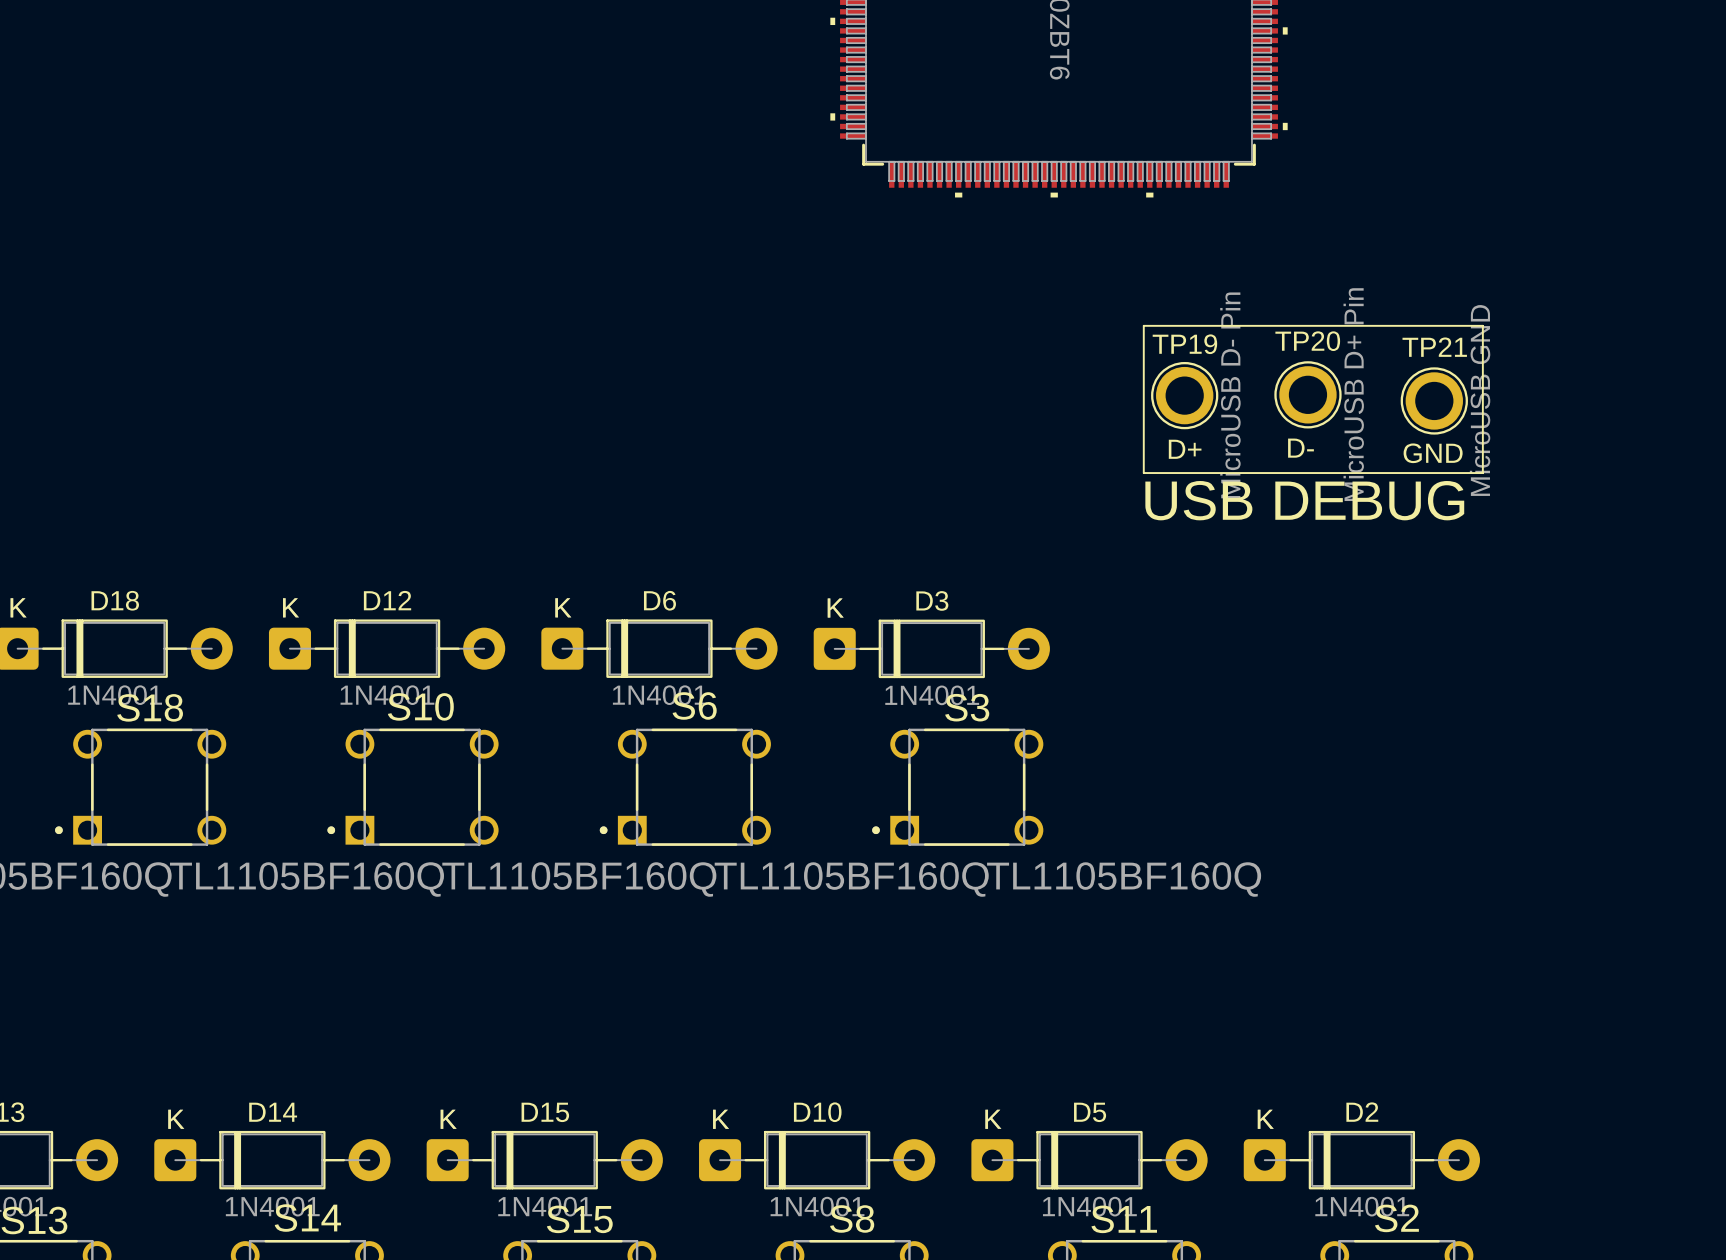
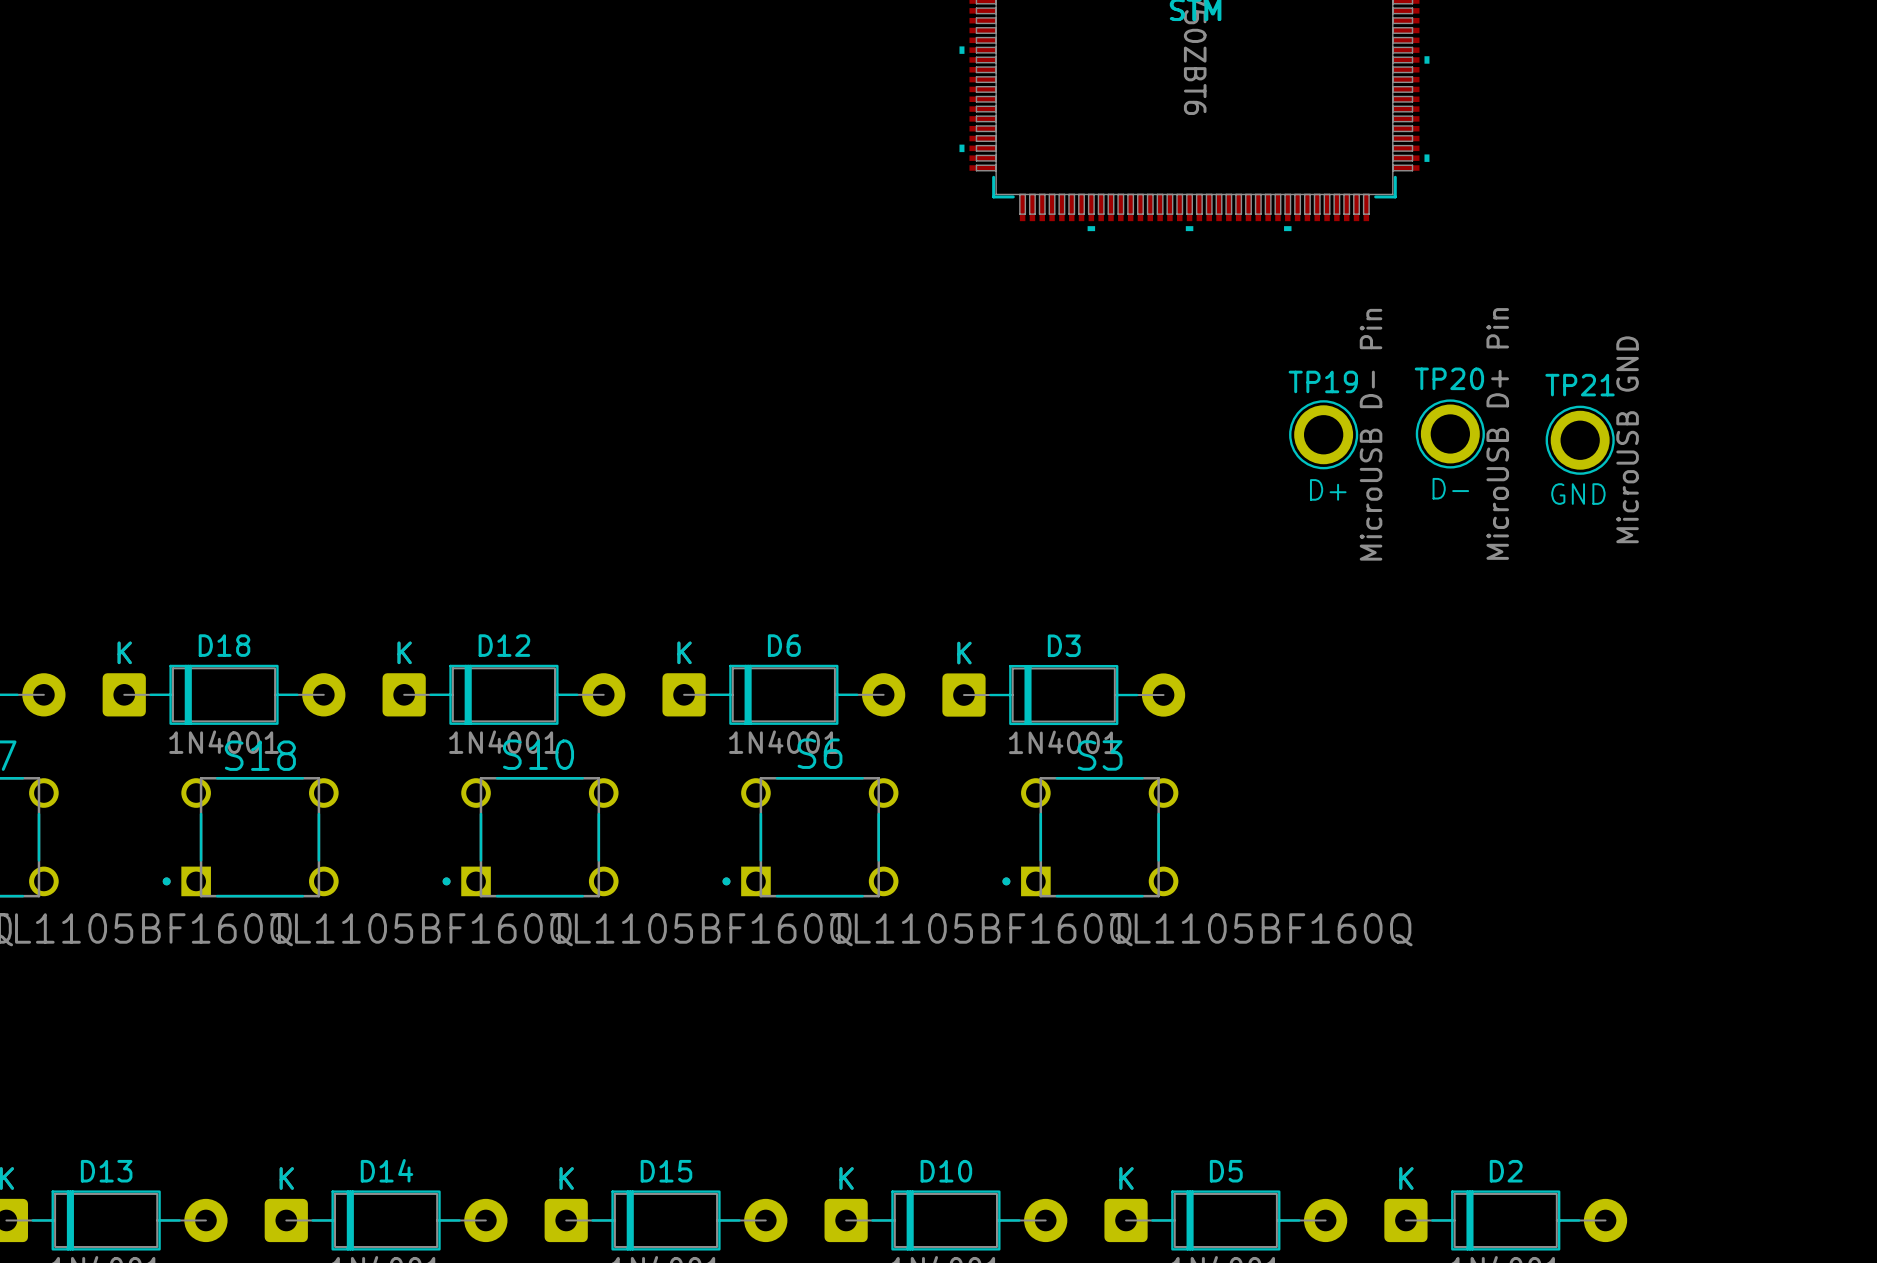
line: (1143, 325) (1482, 325) (1482, 473) (1143, 473) (1143, 325) -> none
text: USB DEBUG (1304, 500) -> none

